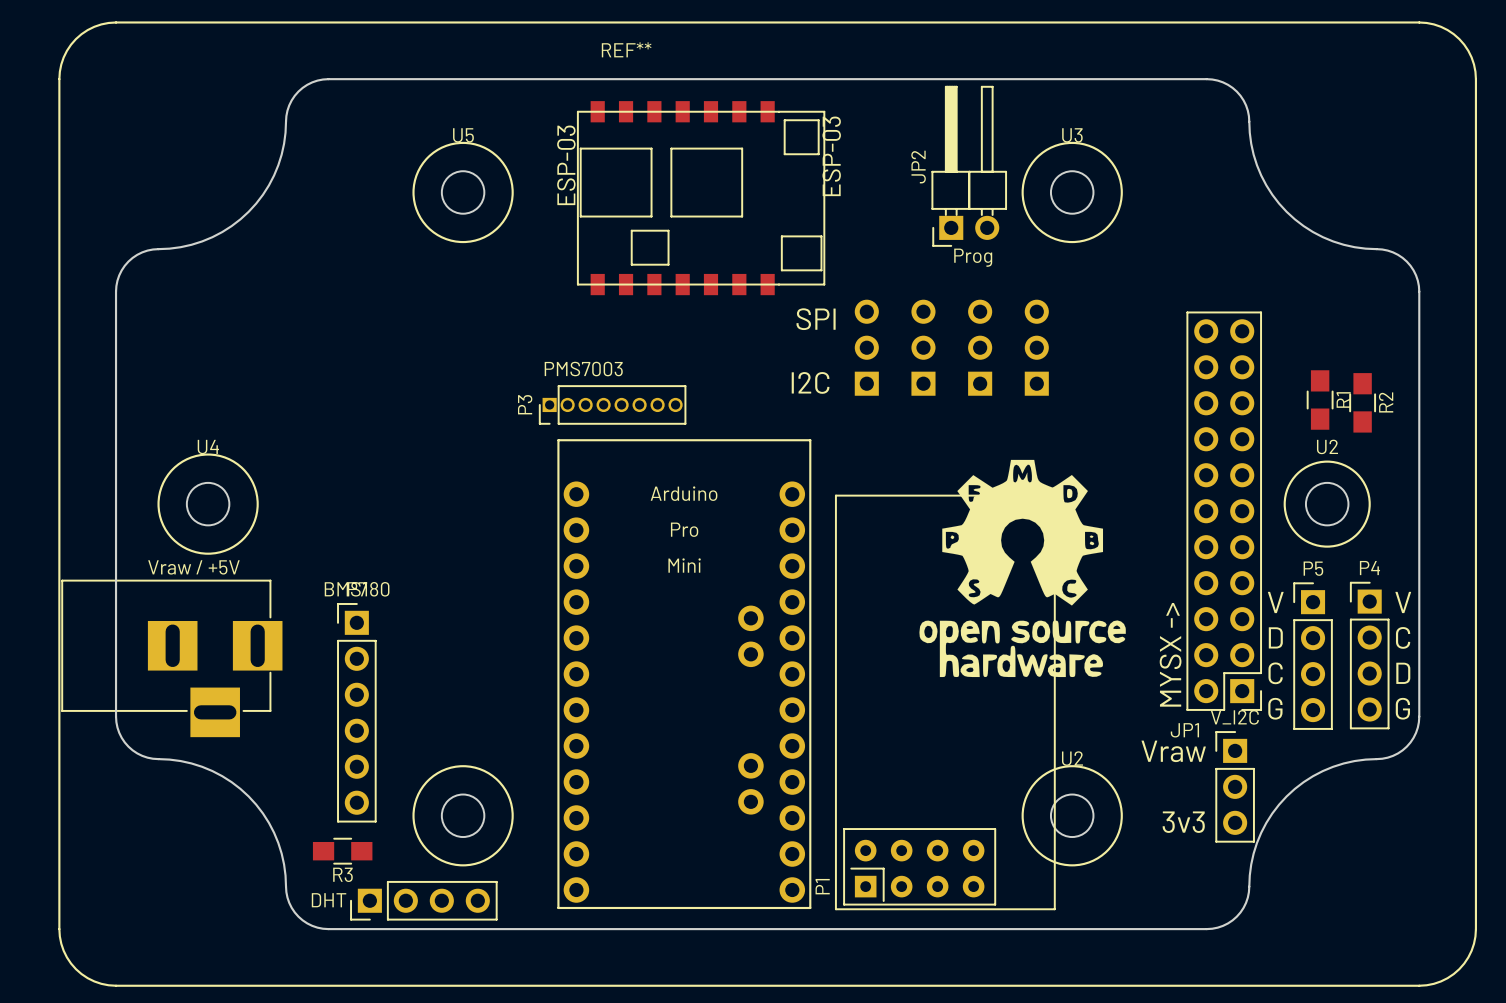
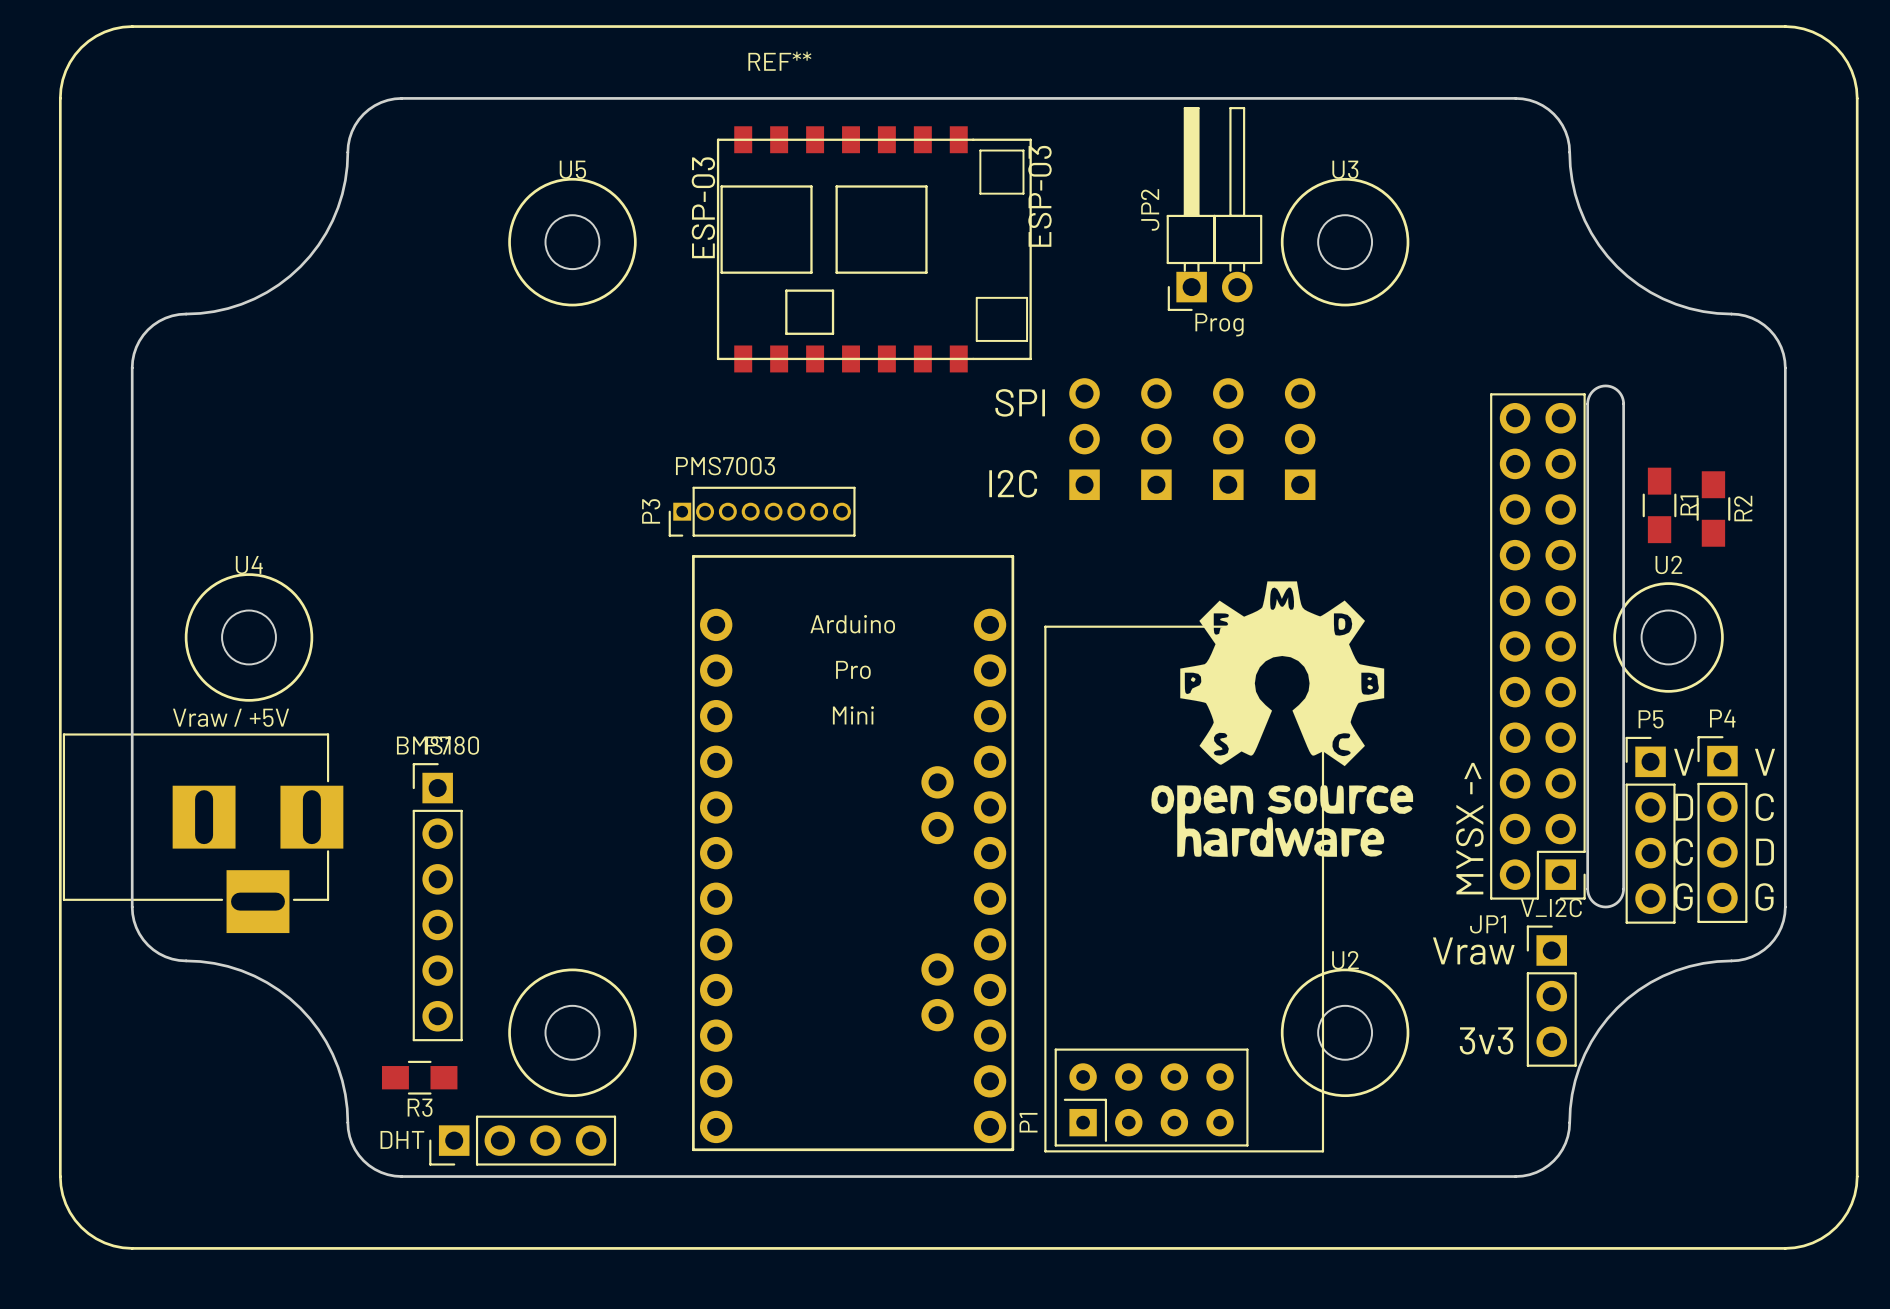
board edge: none -> (1587, 403) (1587, 889) (1592, 901) (1605, 907) (1618, 901) (1623, 889) (1623, 403) (1618, 391) (1605, 385) (1592, 391) (1587, 403)
text position: V (1275, 602) -> V (1684, 762)
text position: D (1275, 637) -> D (1684, 807)
text position: C (1275, 673) -> C (1683, 852)
text position: G (1275, 708) -> G (1683, 897)

